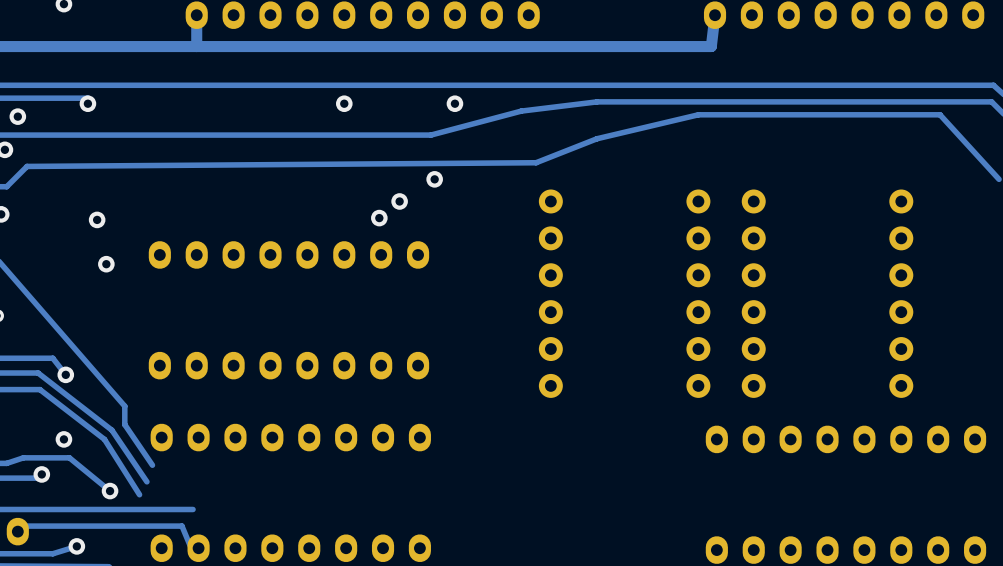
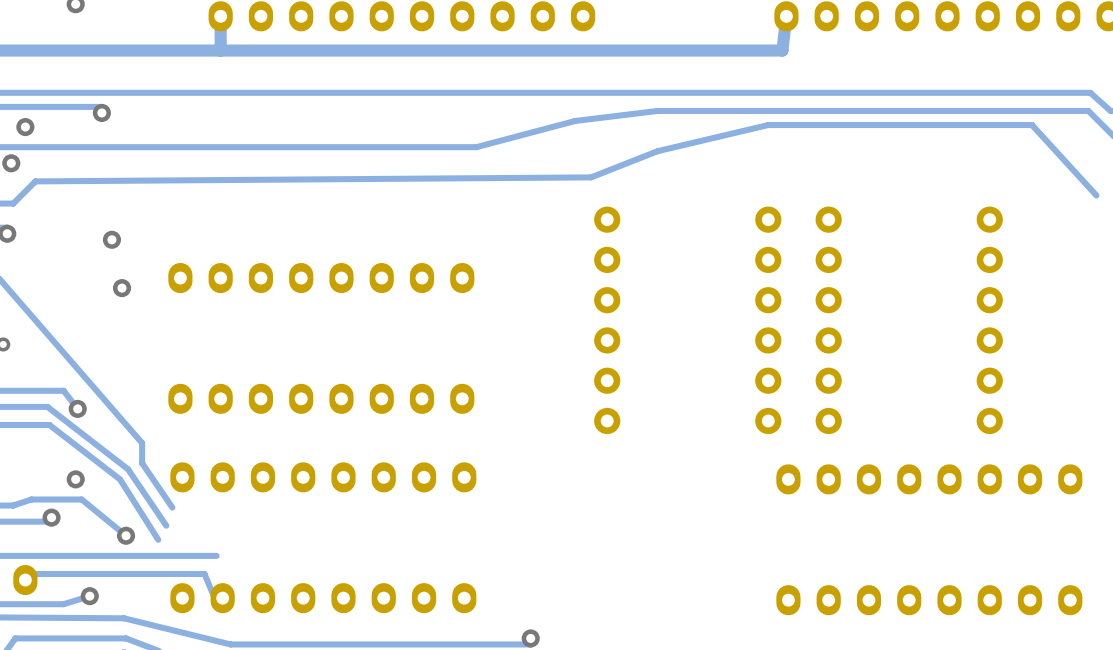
via: (344, 103) -> none
via: (454, 103) -> none
via: (434, 179) -> none
via: (399, 201) -> none
via: (379, 218) -> none

